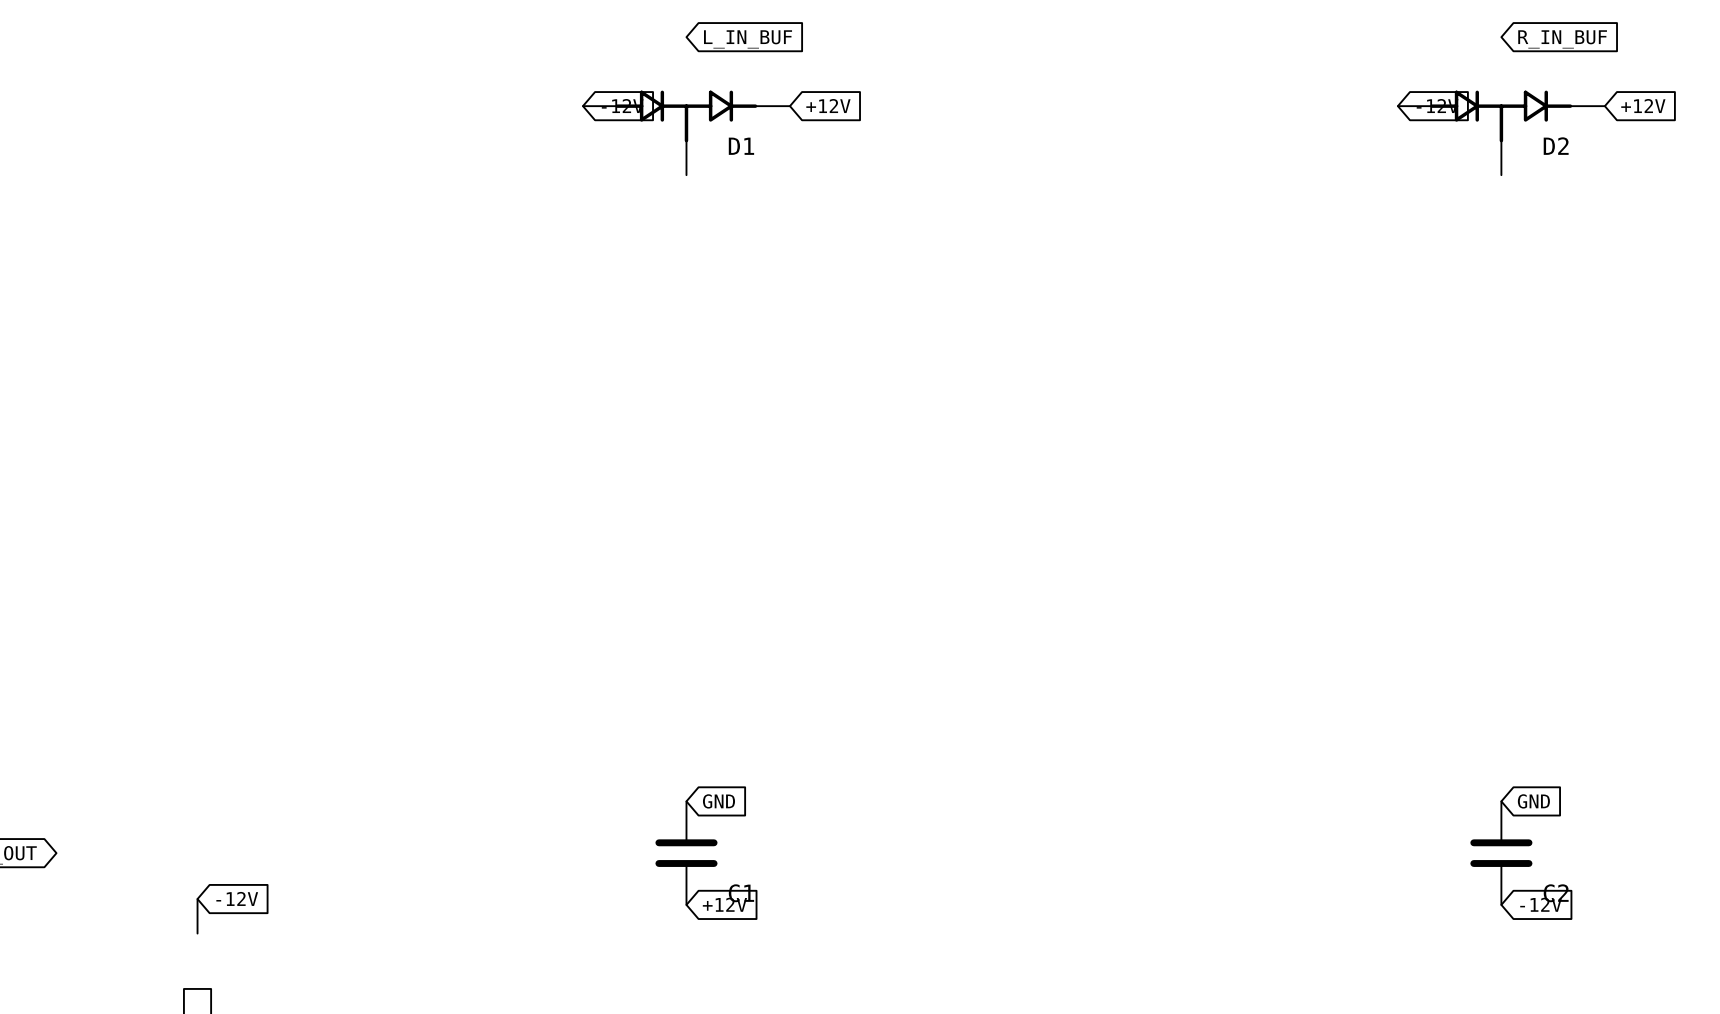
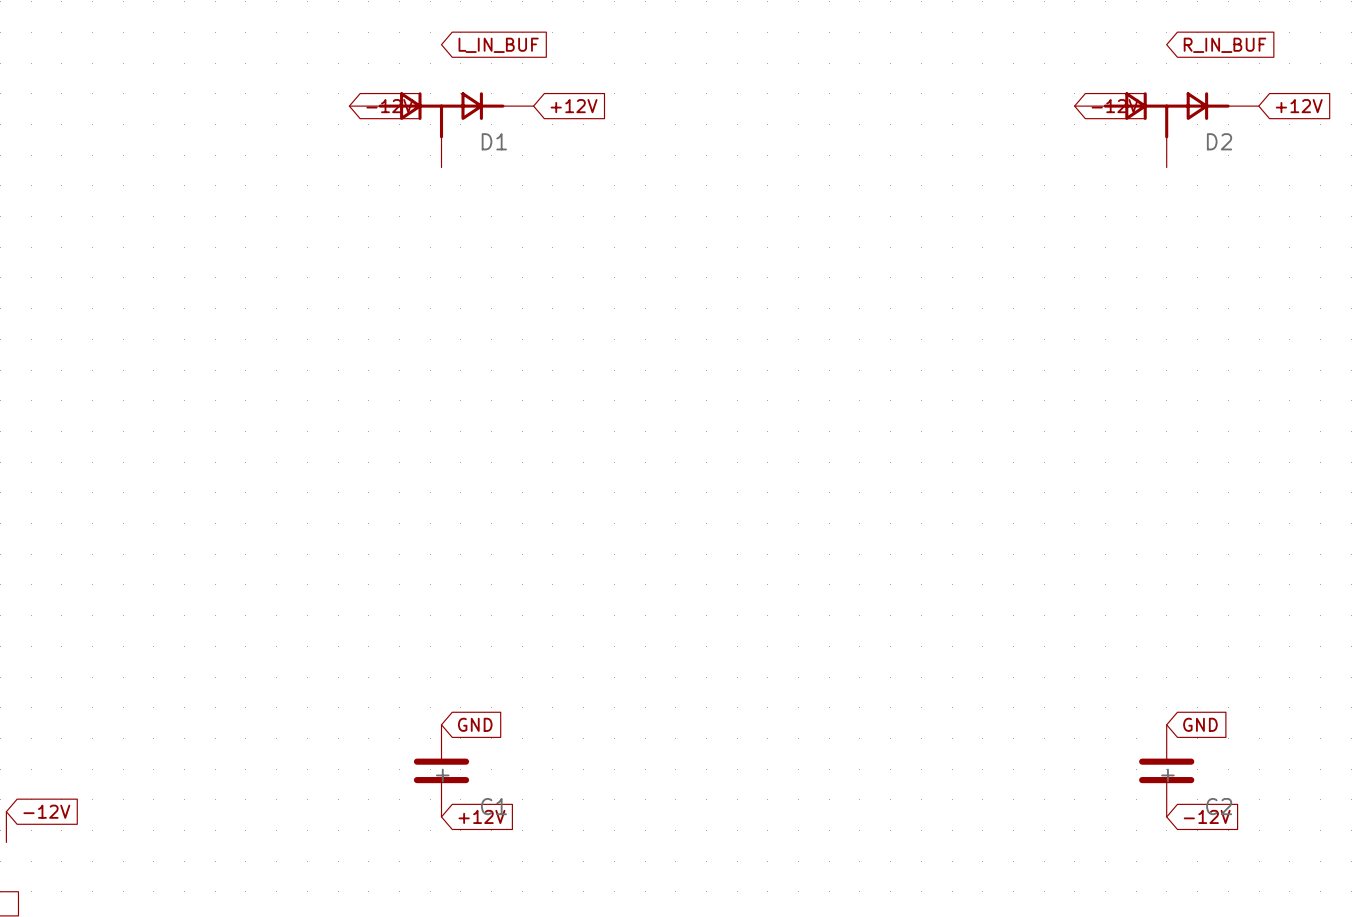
D1 symbol: [582, 90, 790, 176] -> [349, 92, 534, 168]
D2 symbol: [1397, 90, 1605, 176] -> [1074, 92, 1259, 168]
C1 pin name: none -> + (442, 775)
C2 pin name: none -> + (1167, 775)

